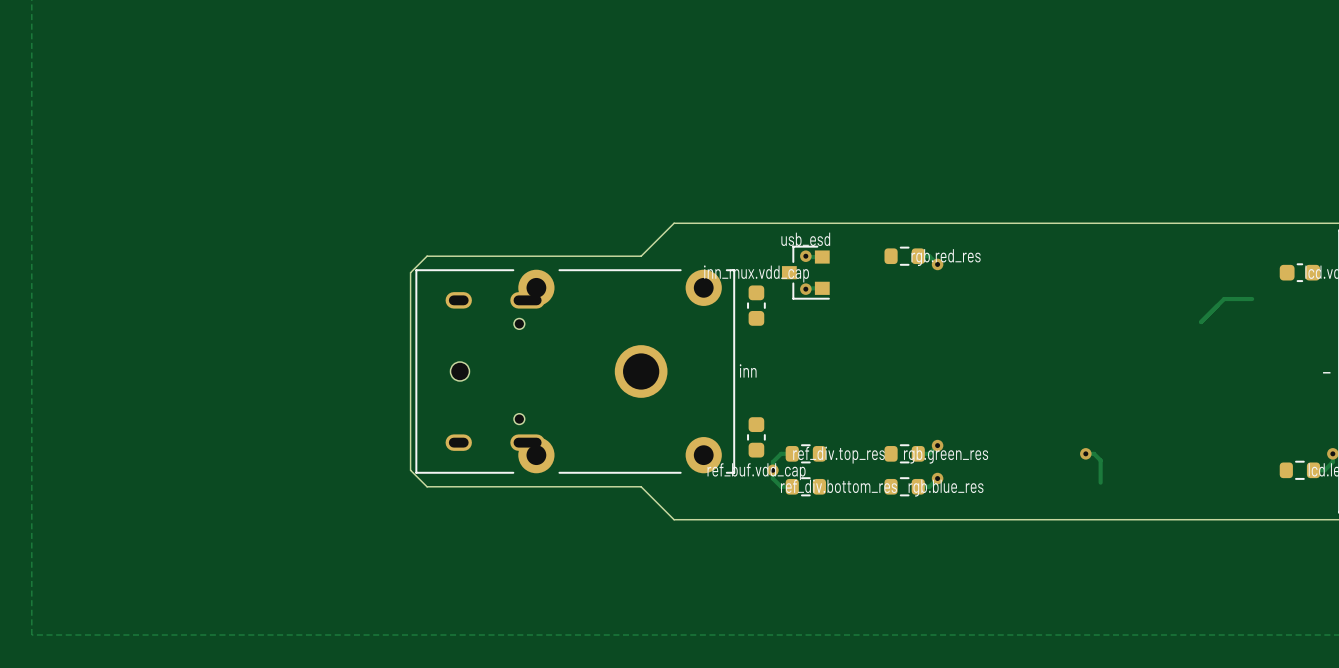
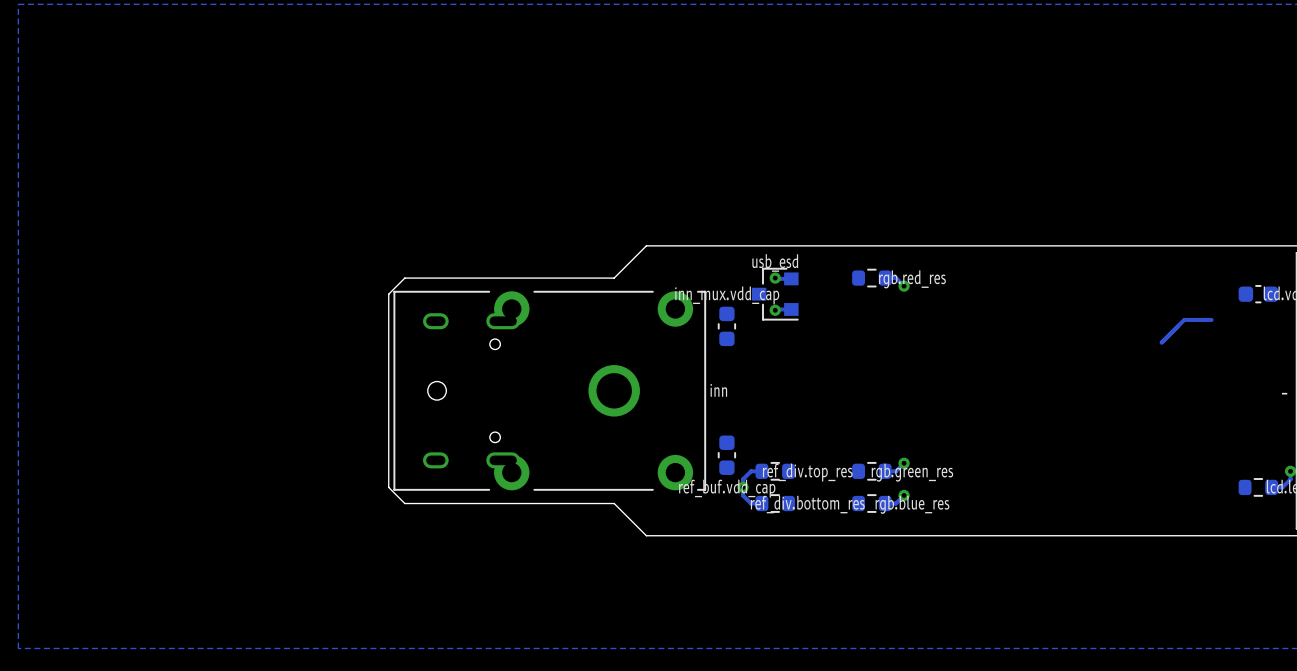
track: (1085, 453) (1094, 453) (1100, 460) (1100, 482) -> none
via: (1085, 453) -> none

